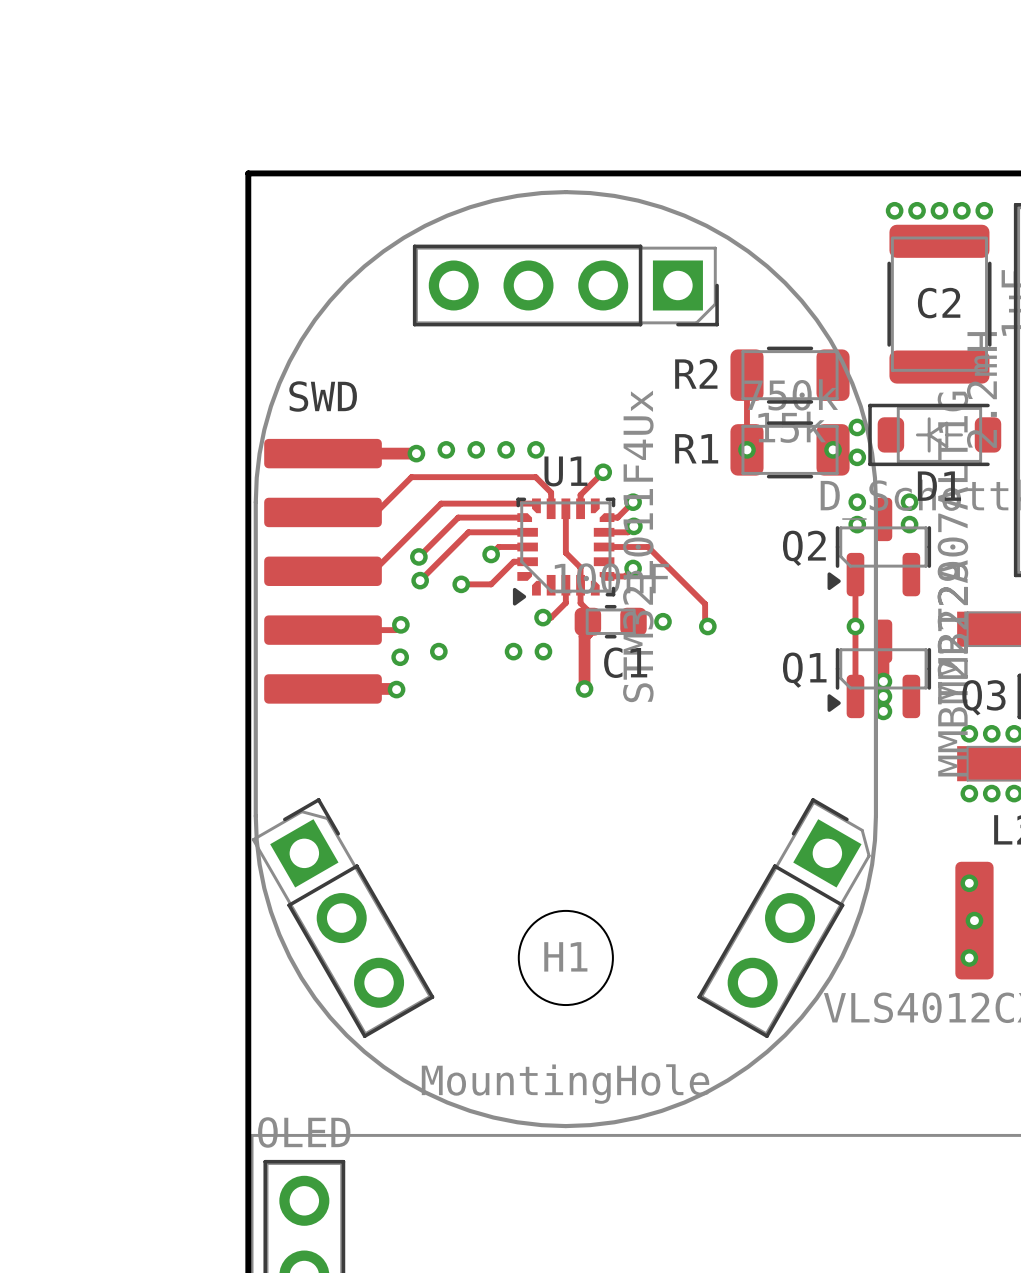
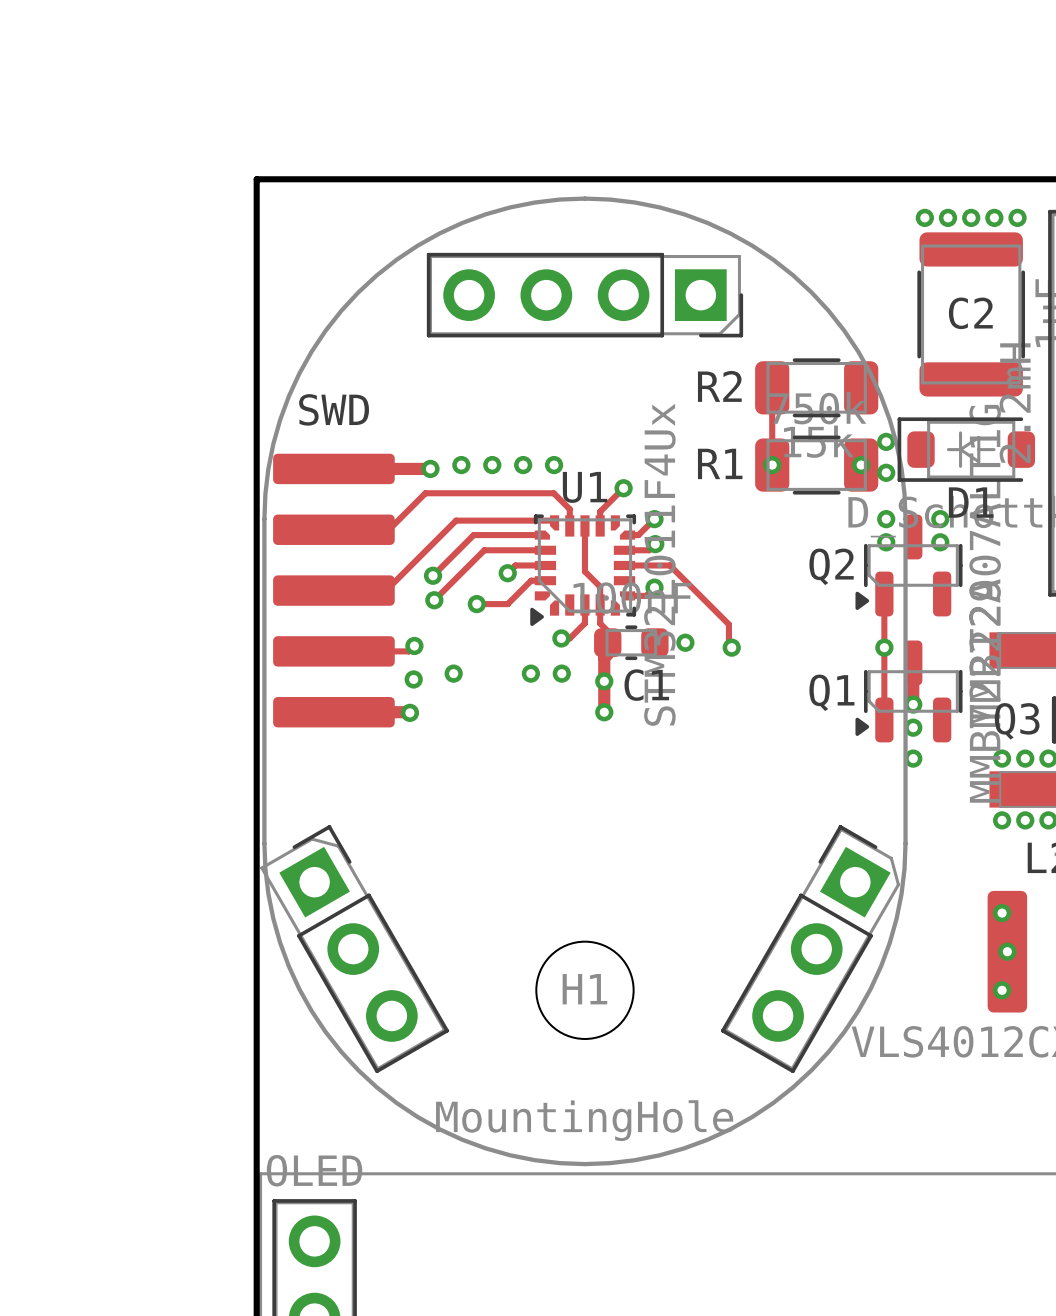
via: none -> (604, 681)
via: (883, 696) -> none
via: none -> (913, 727)
via: (883, 711) -> none
via: none -> (913, 758)

